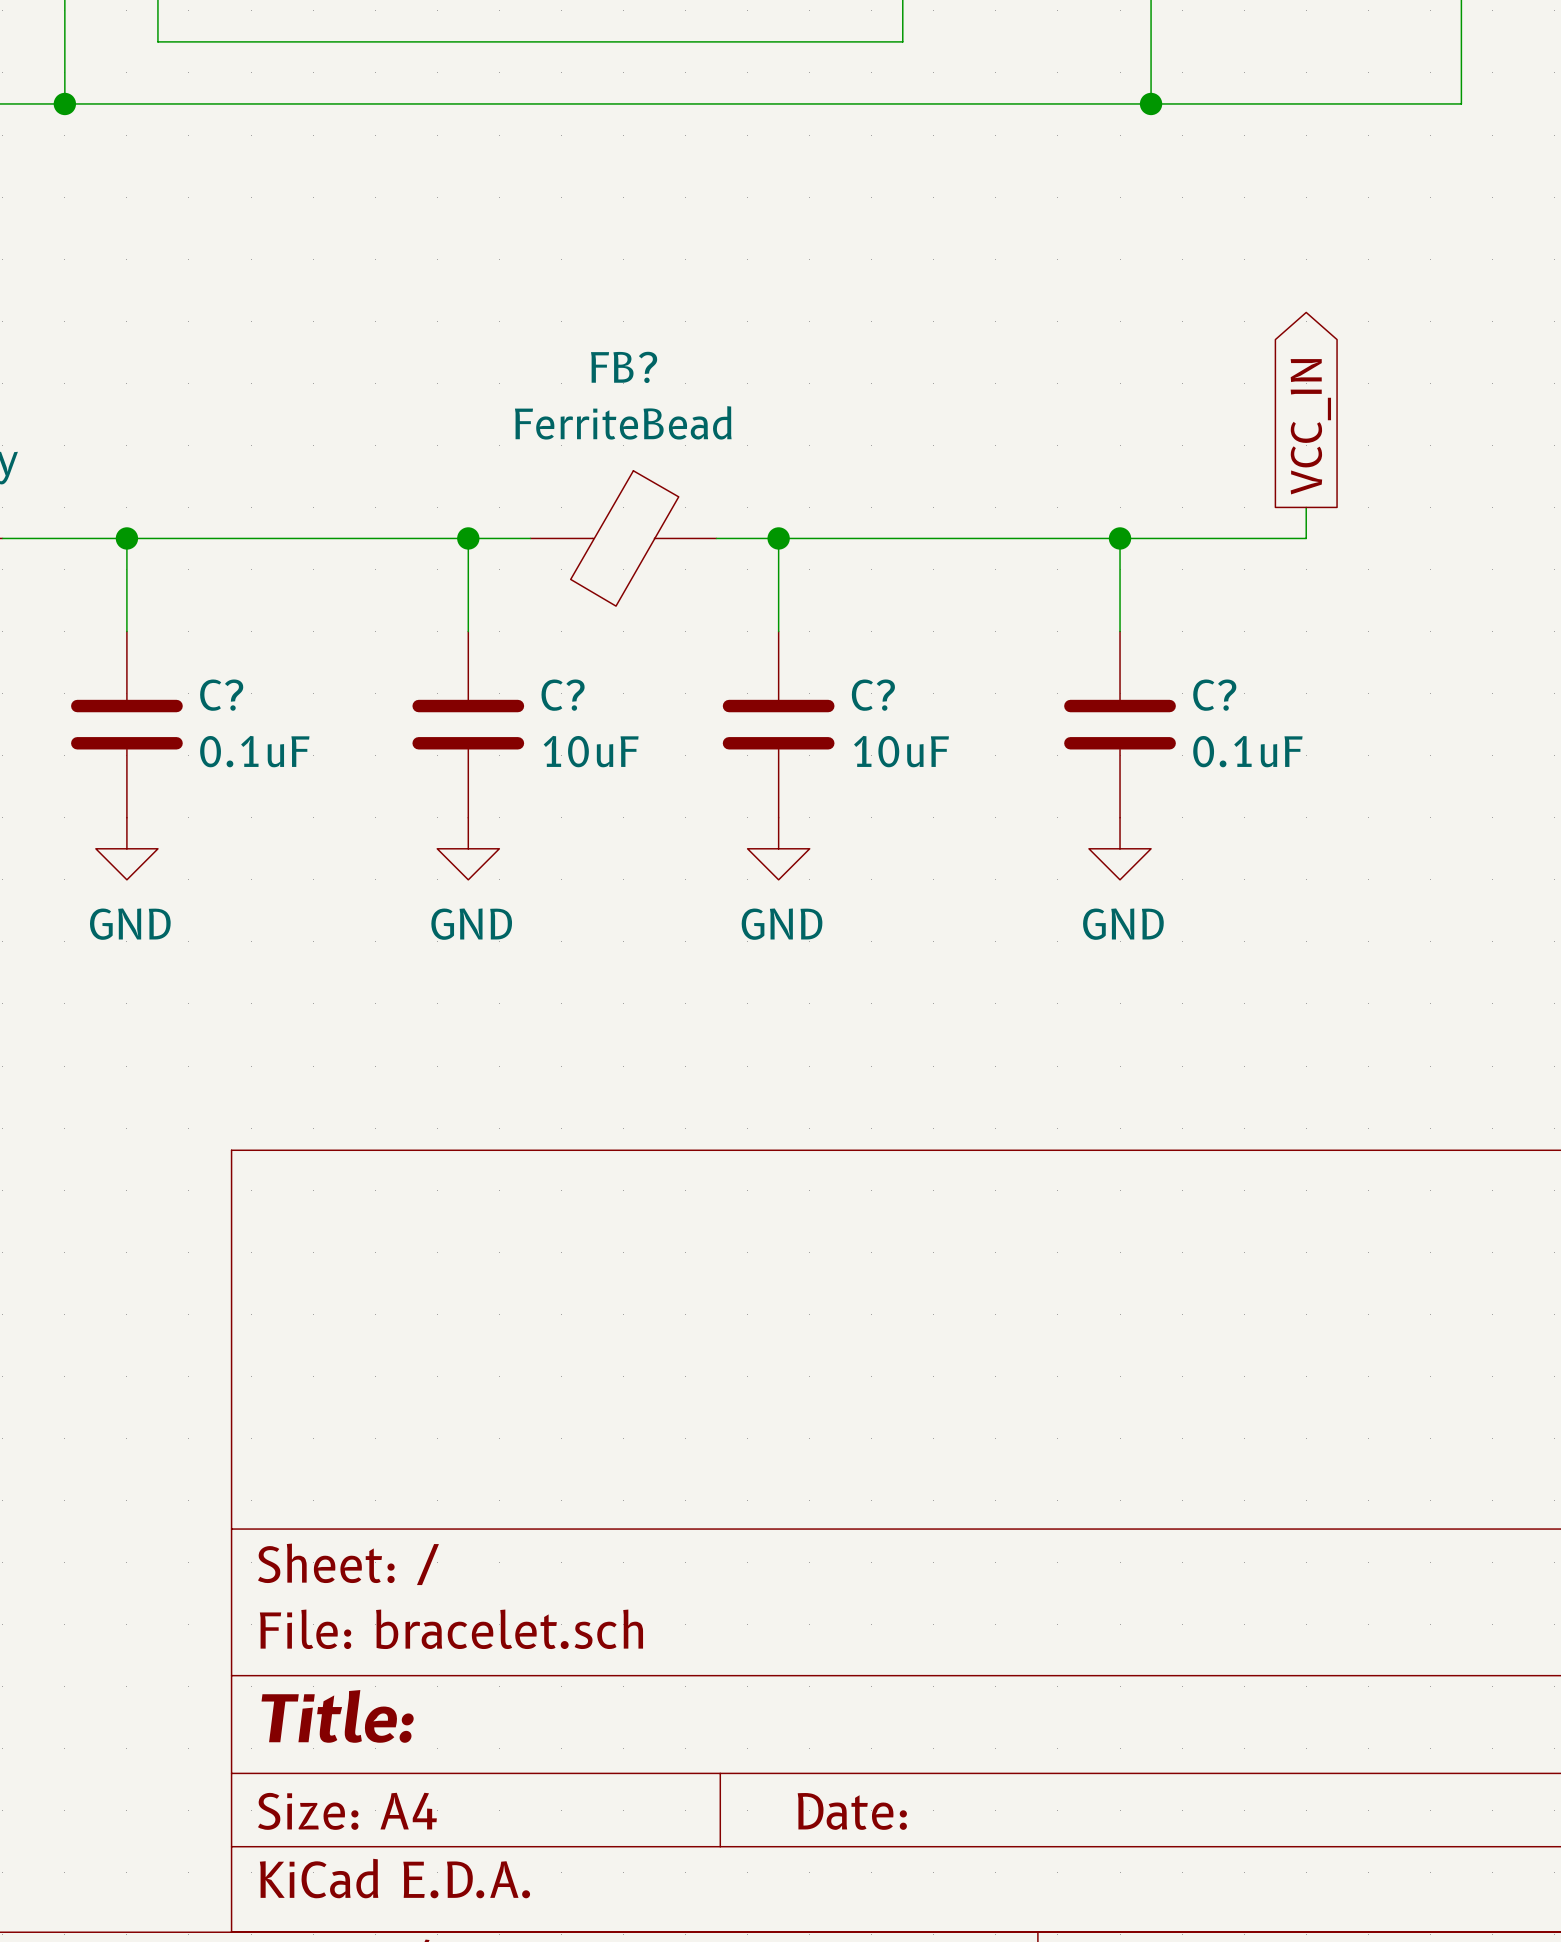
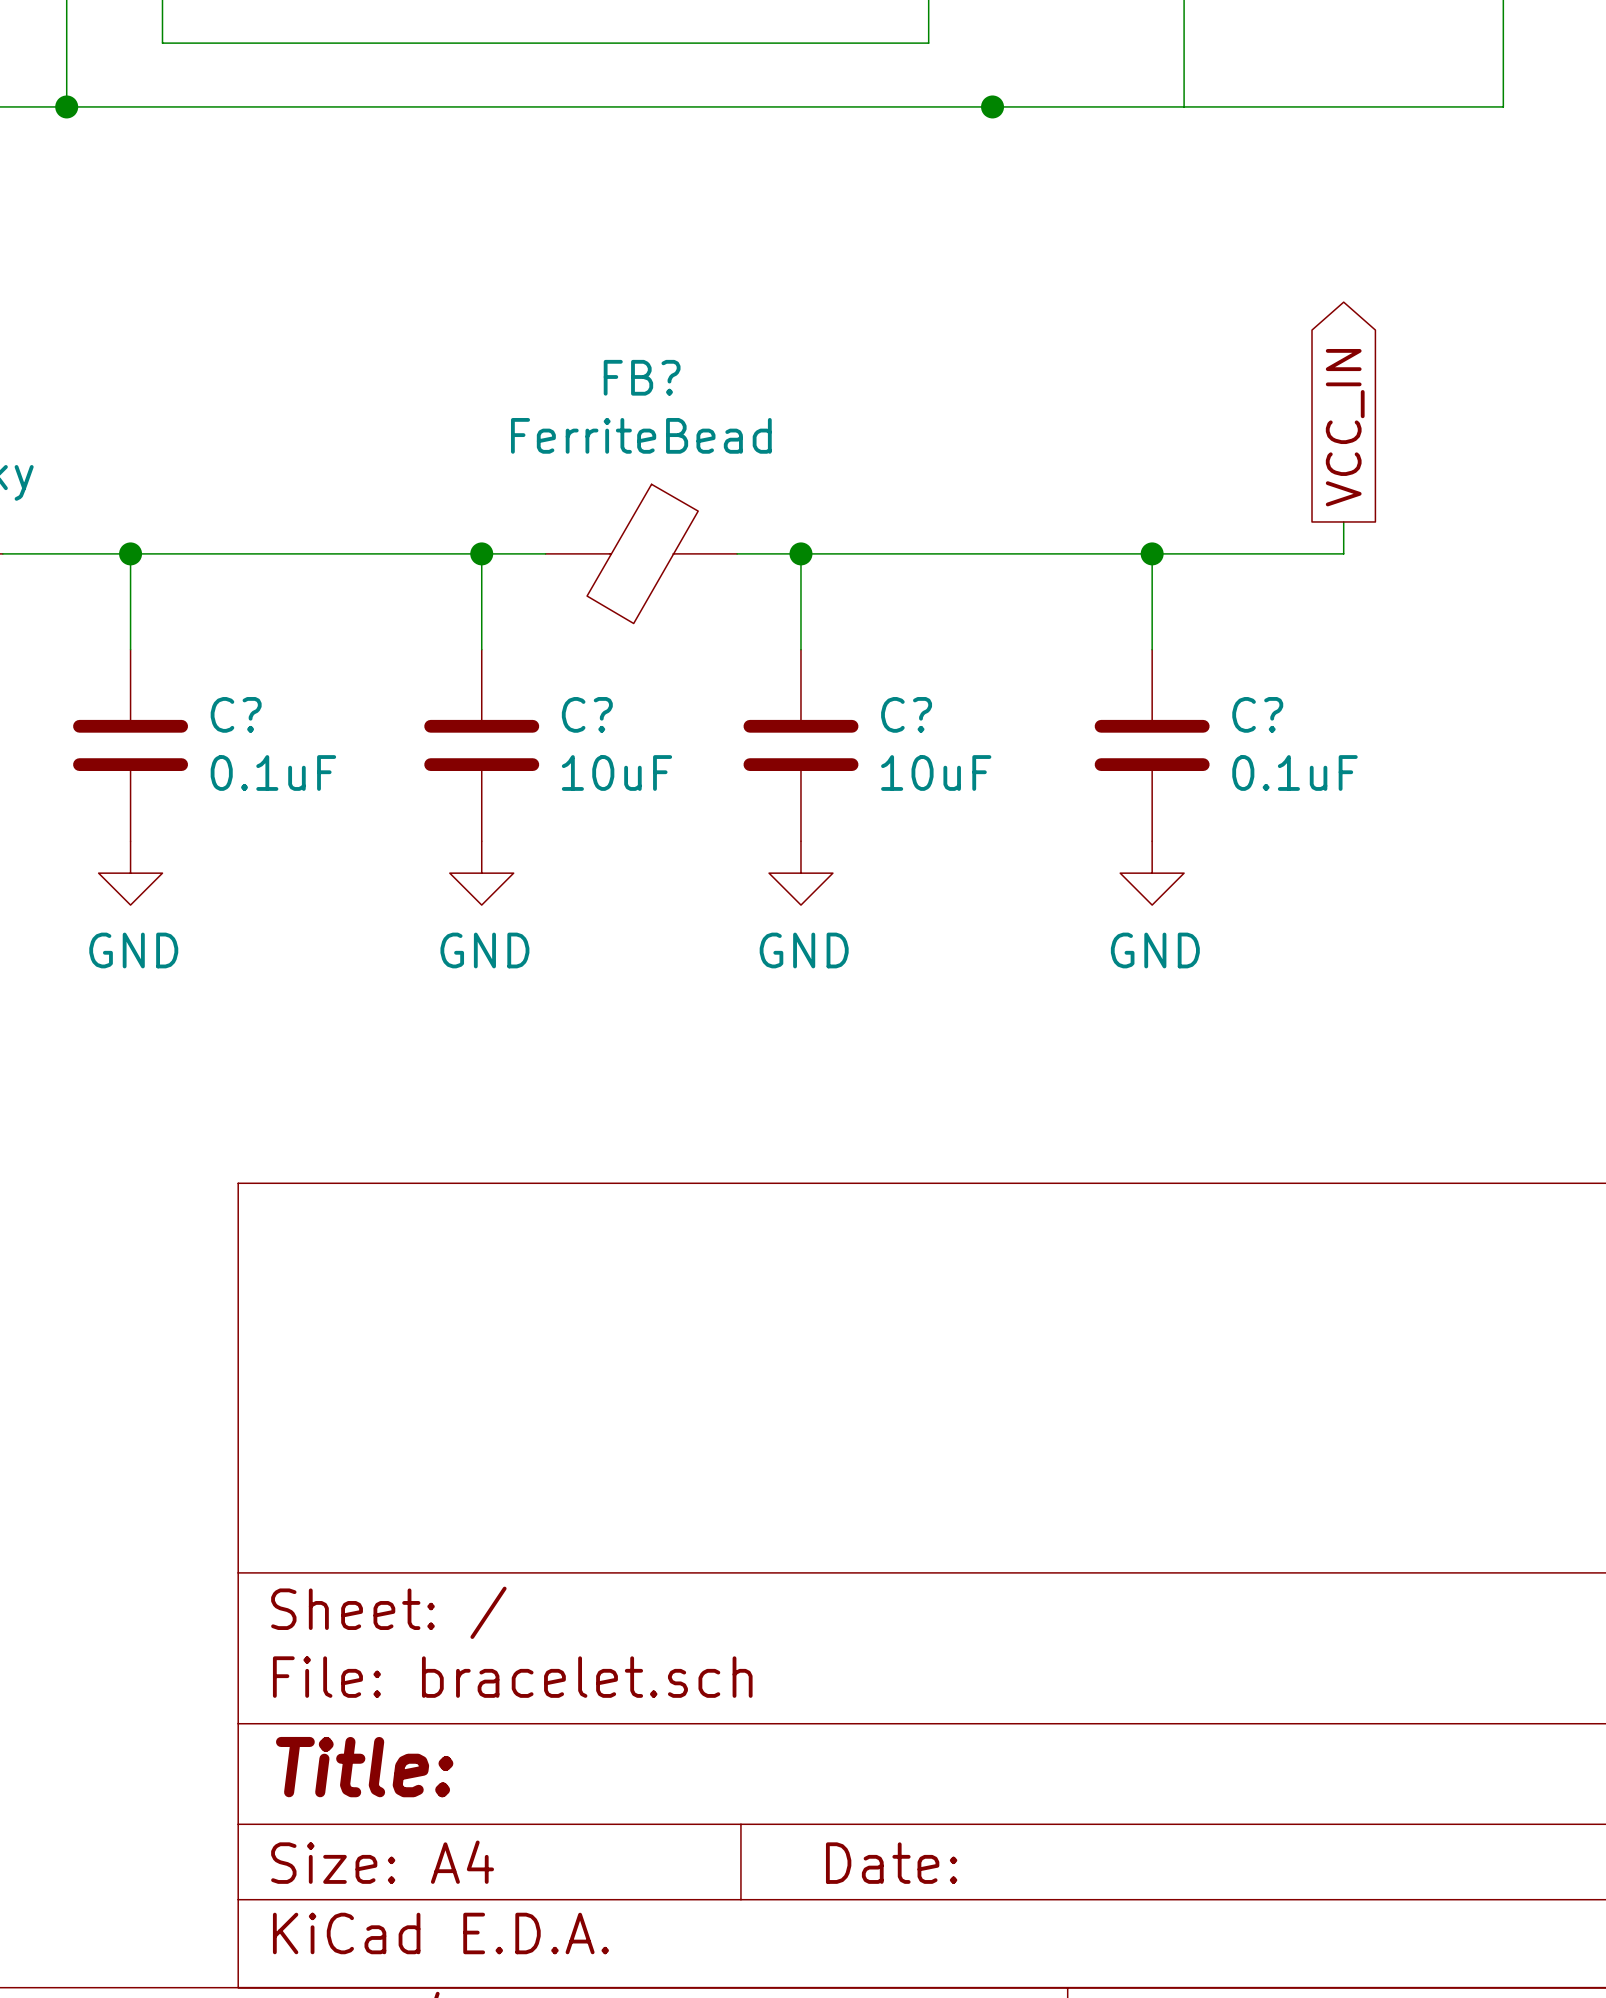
junction: none -> (992, 106)
junction: (1151, 103) -> none

